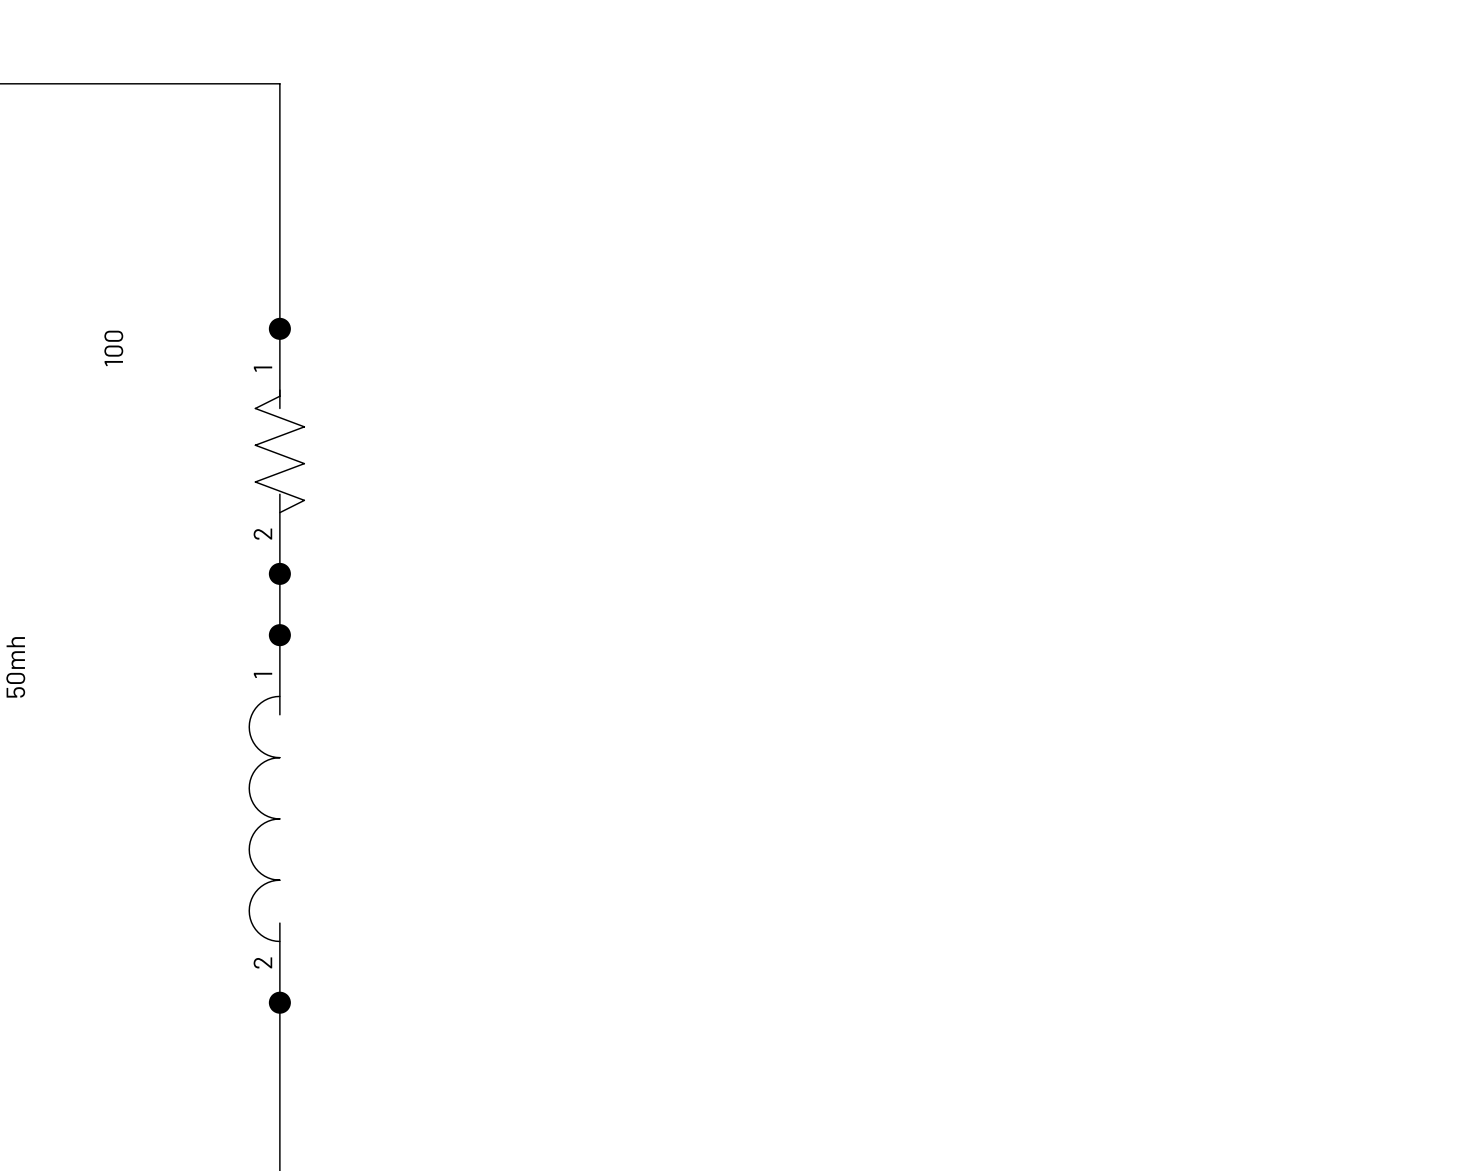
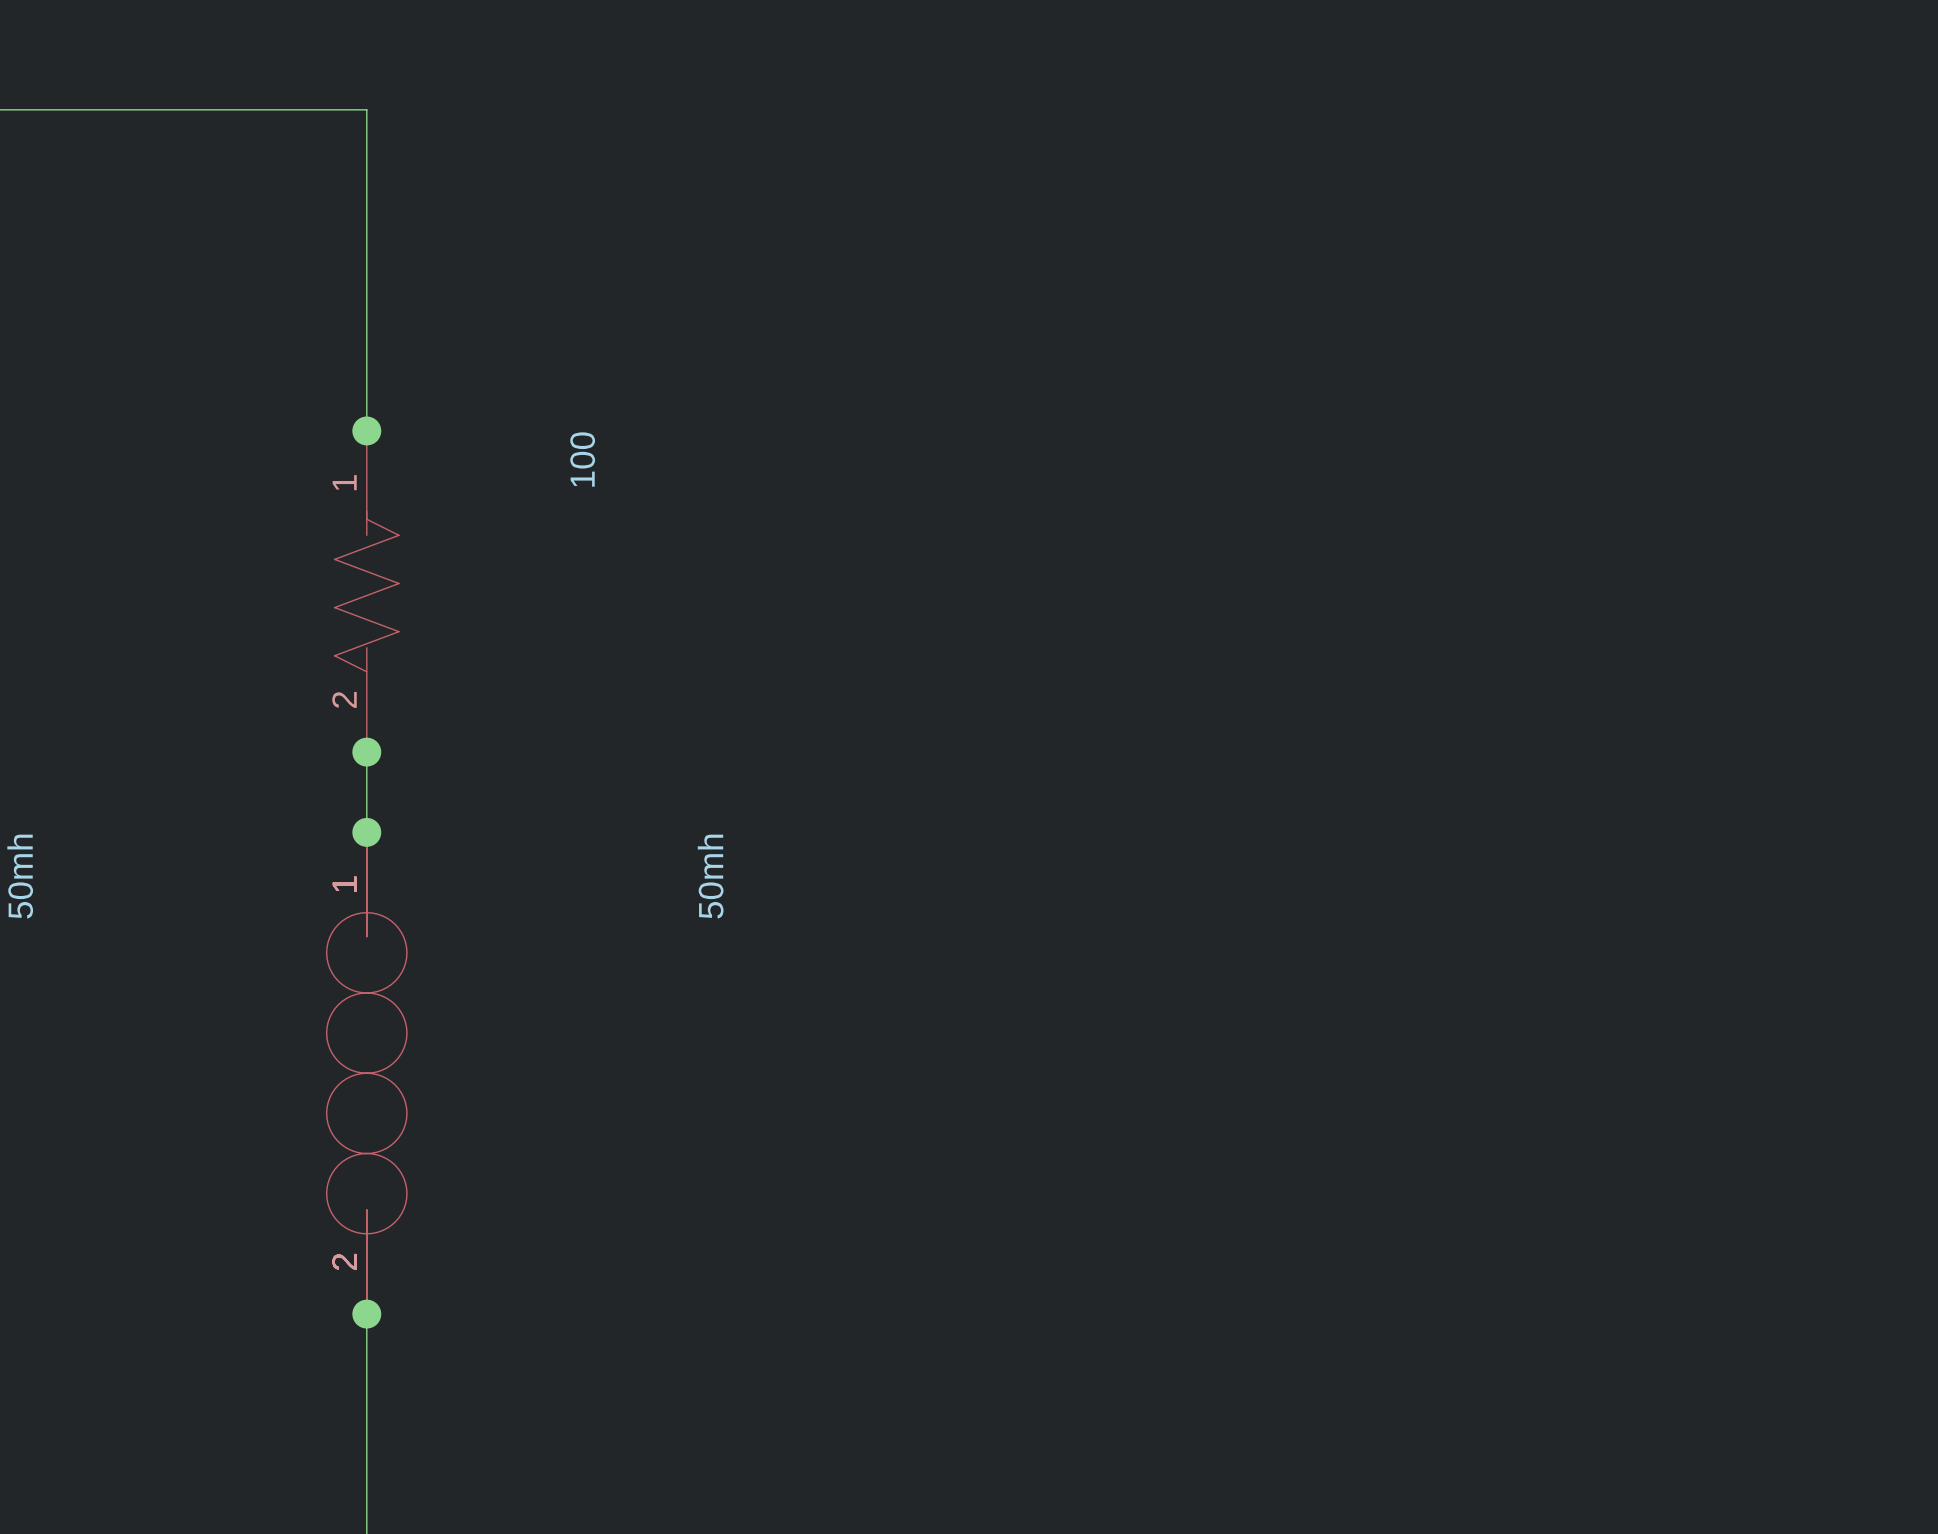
part flip: as is (279, 451) -> left-right (366, 591)
part: none -> 50mh (386, 1073)

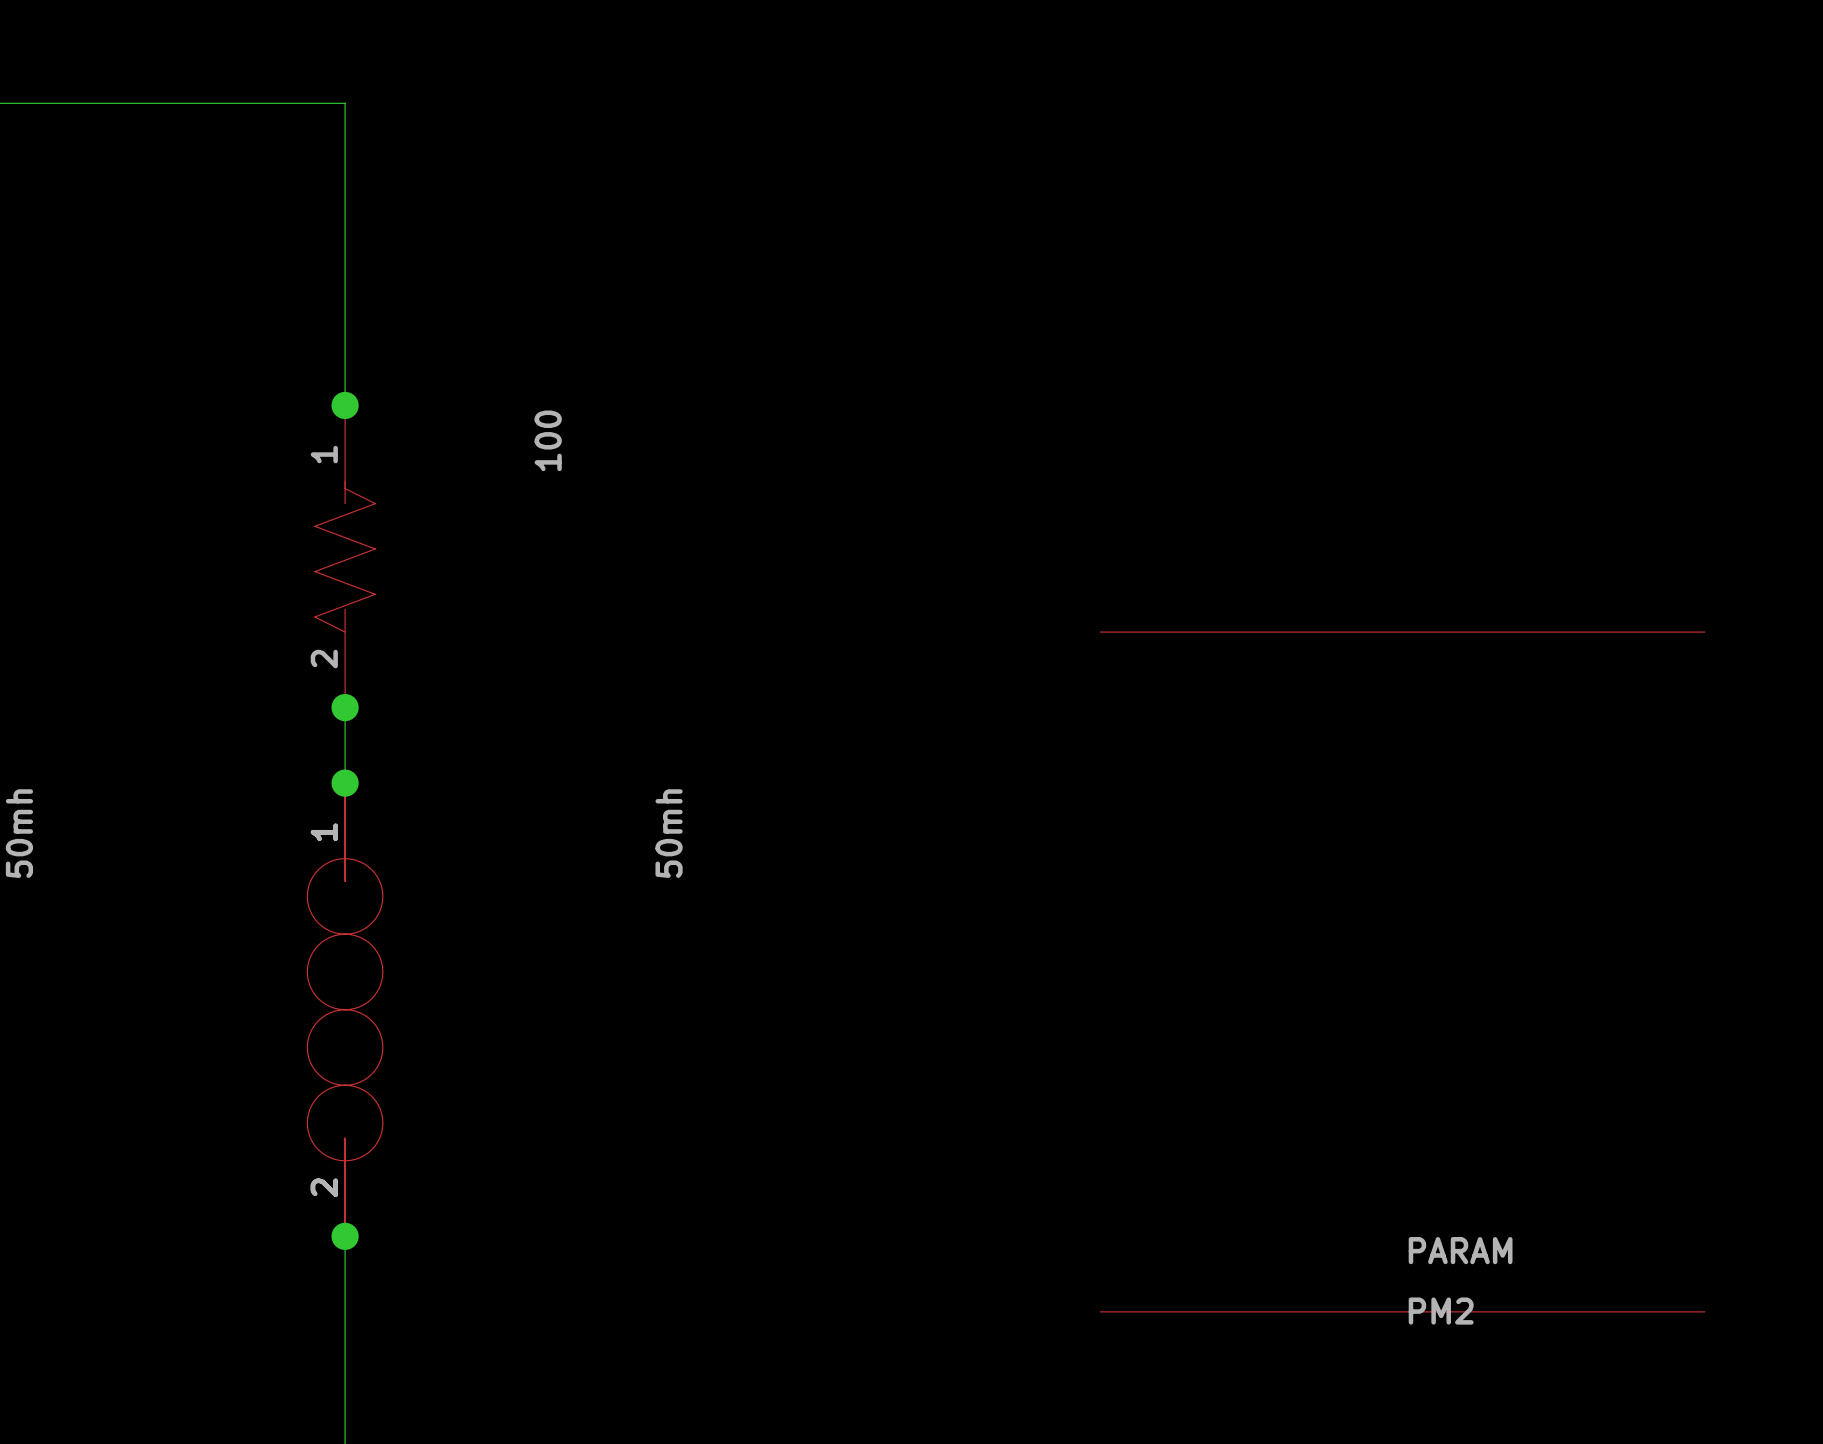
part: none -> (1402, 632)
PM2: none -> PARAM (1402, 1311)

